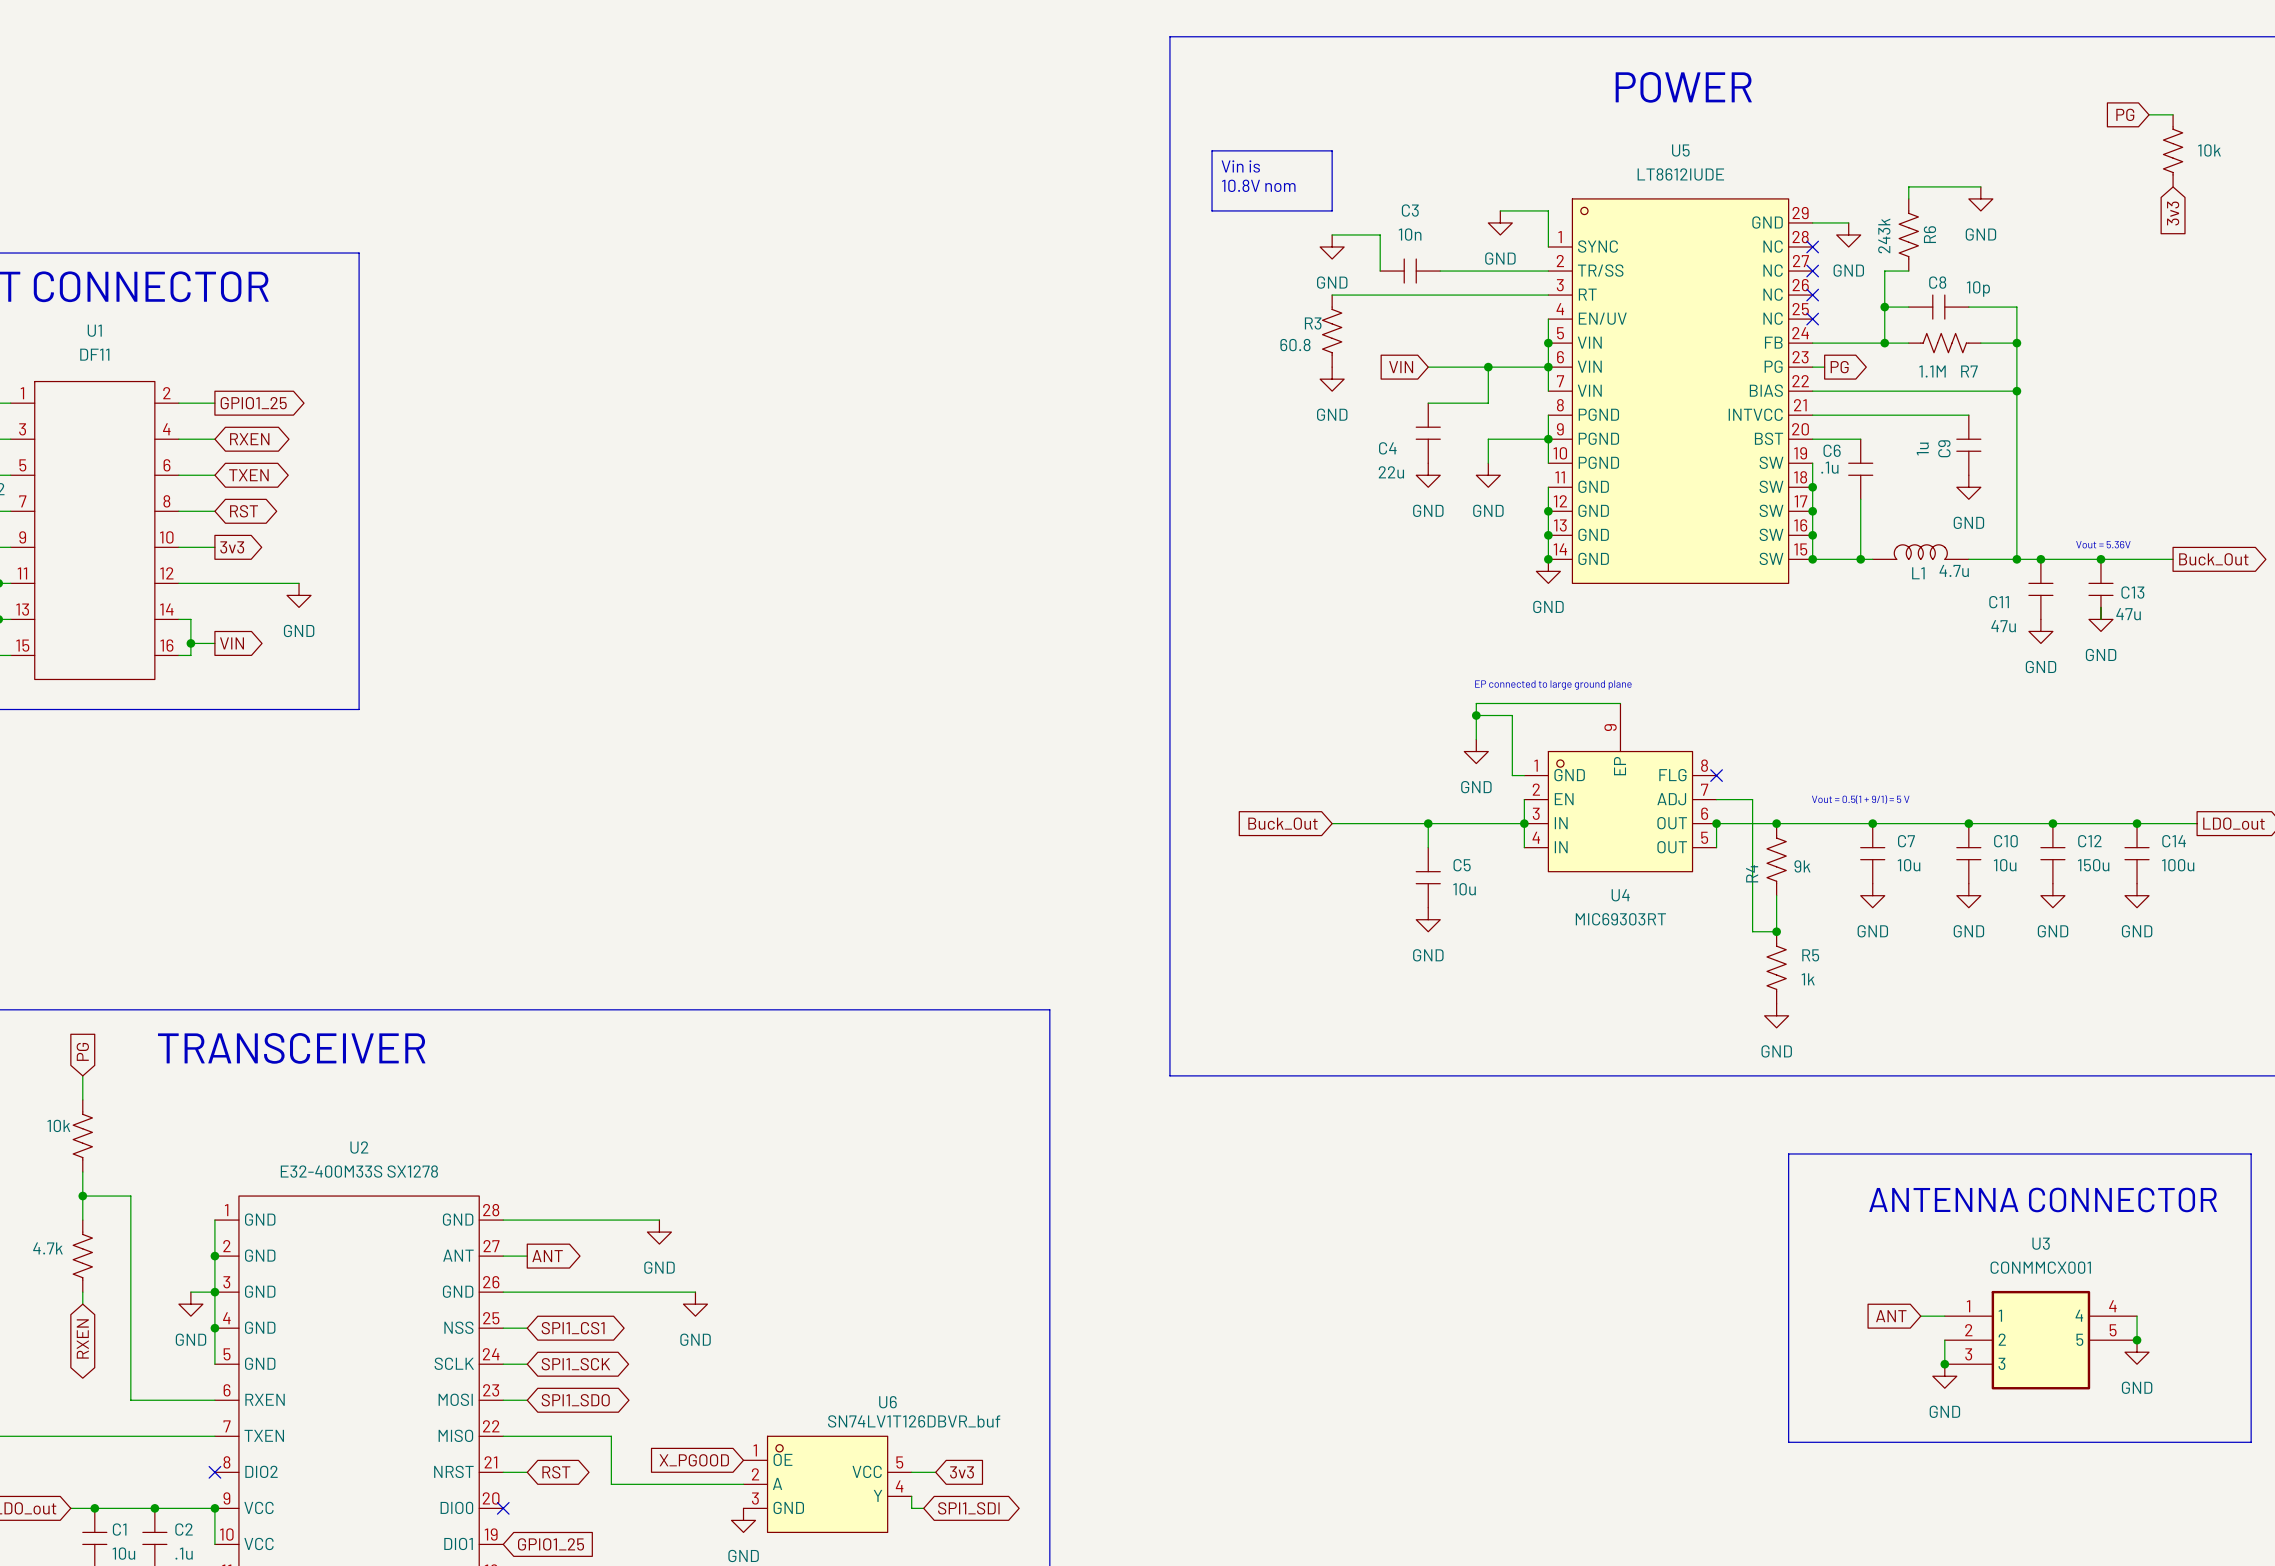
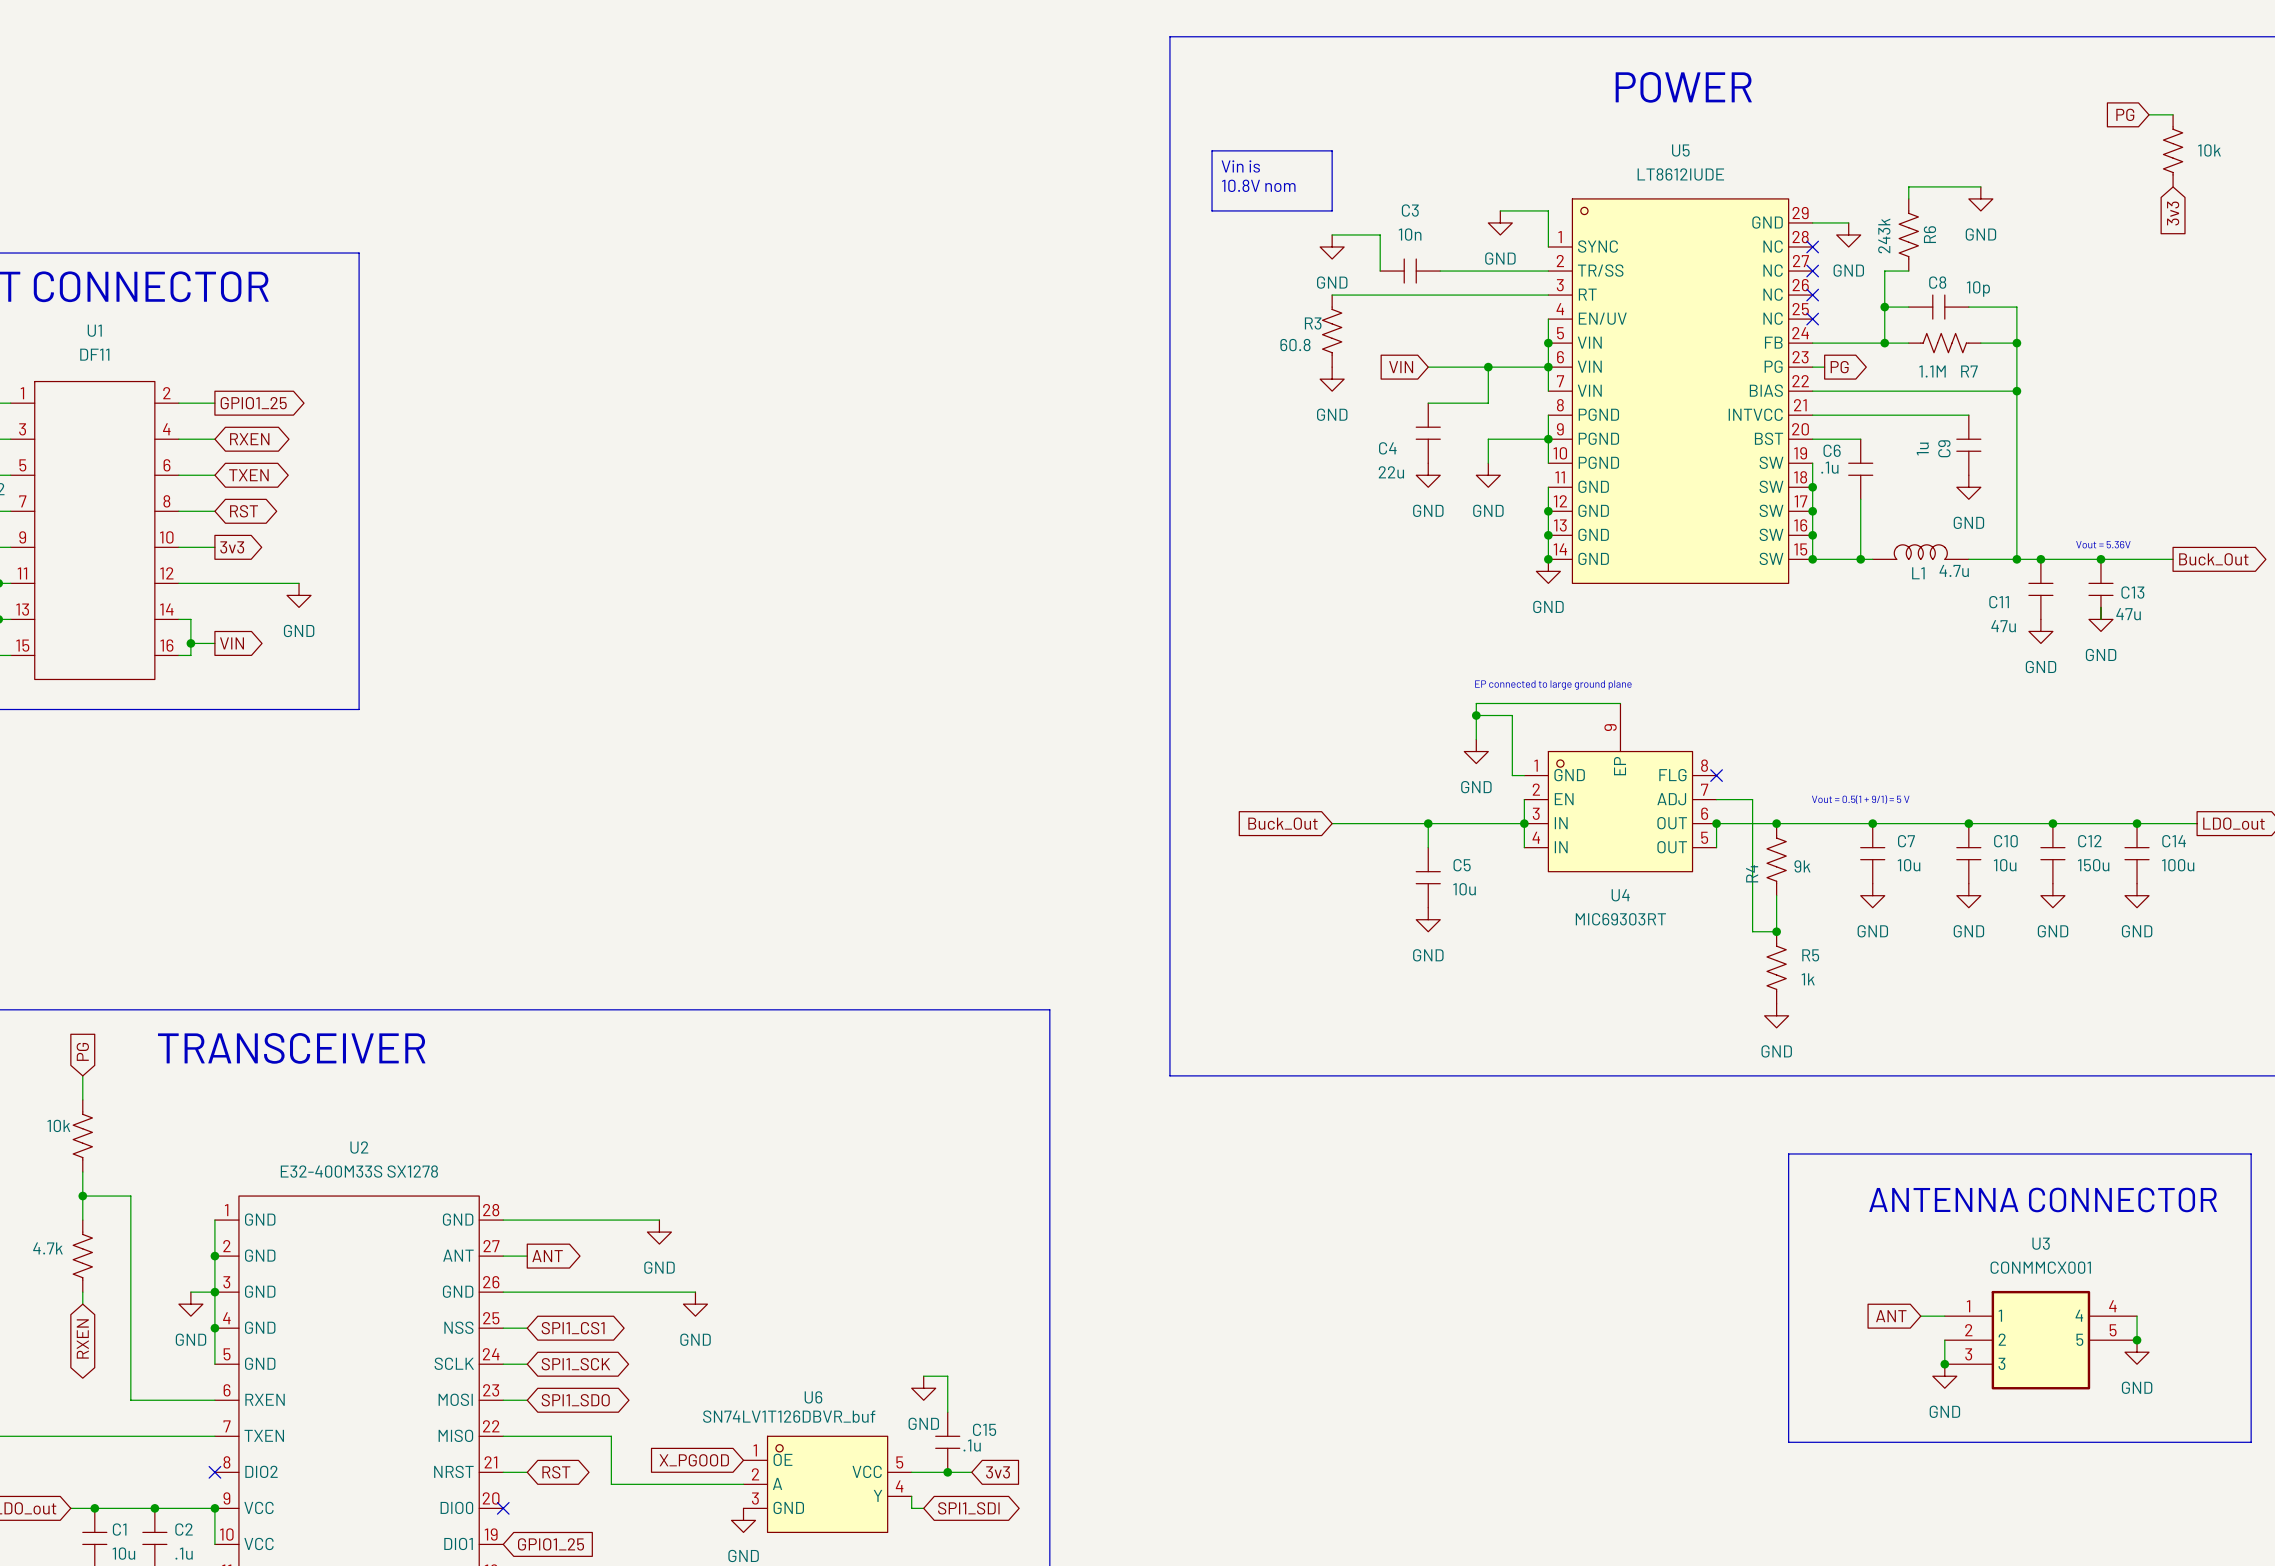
wire: none -> (923, 1376) (947, 1376) (947, 1412)
power symbol: none -> GND (923, 1388)
U6 name position: U6 (887, 1402) -> U6 (813, 1397)
U6 value position: SN74LV1T126DBVR_buf (914, 1421) -> SN74LV1T126DBVR_buf (789, 1416)
C15: none -> .1u (947, 1442)
wire: none -> (935, 1472) (971, 1472)
junction: none -> (947, 1472)
global label position: 3v3 (962, 1472) -> 3v3 (998, 1472)

